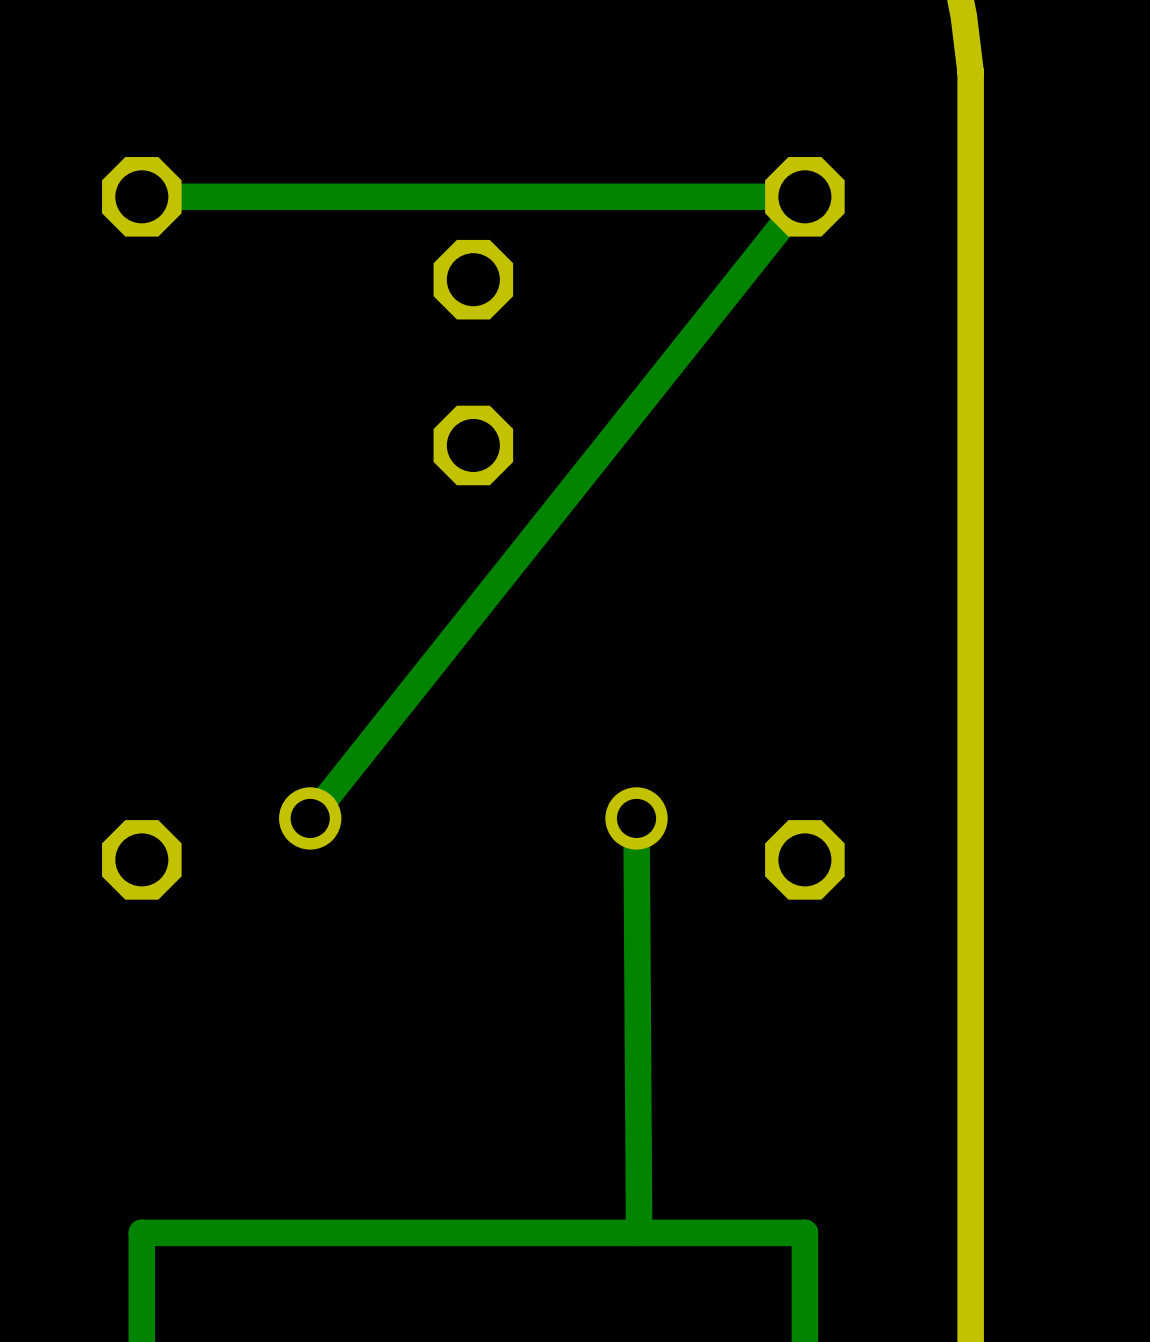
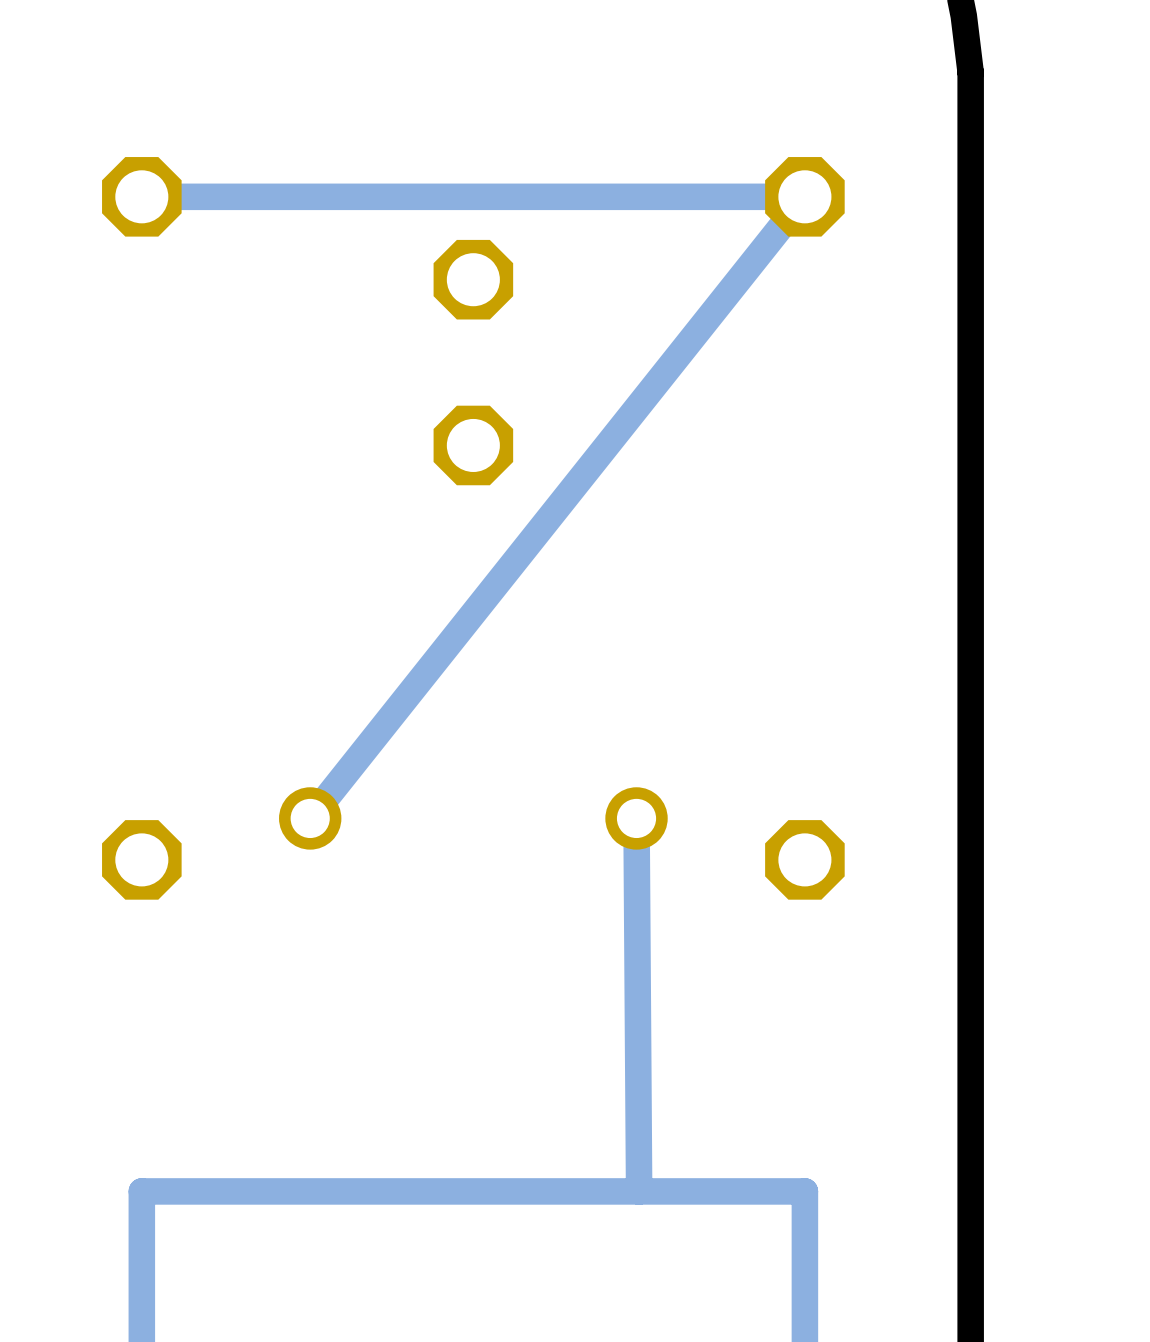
track: (636, 818) (639, 1232) -> (636, 818) (639, 1191)
track: (804, 1232) (141, 1232) -> (804, 1232) (804, 1191) (141, 1191) (141, 1232)

